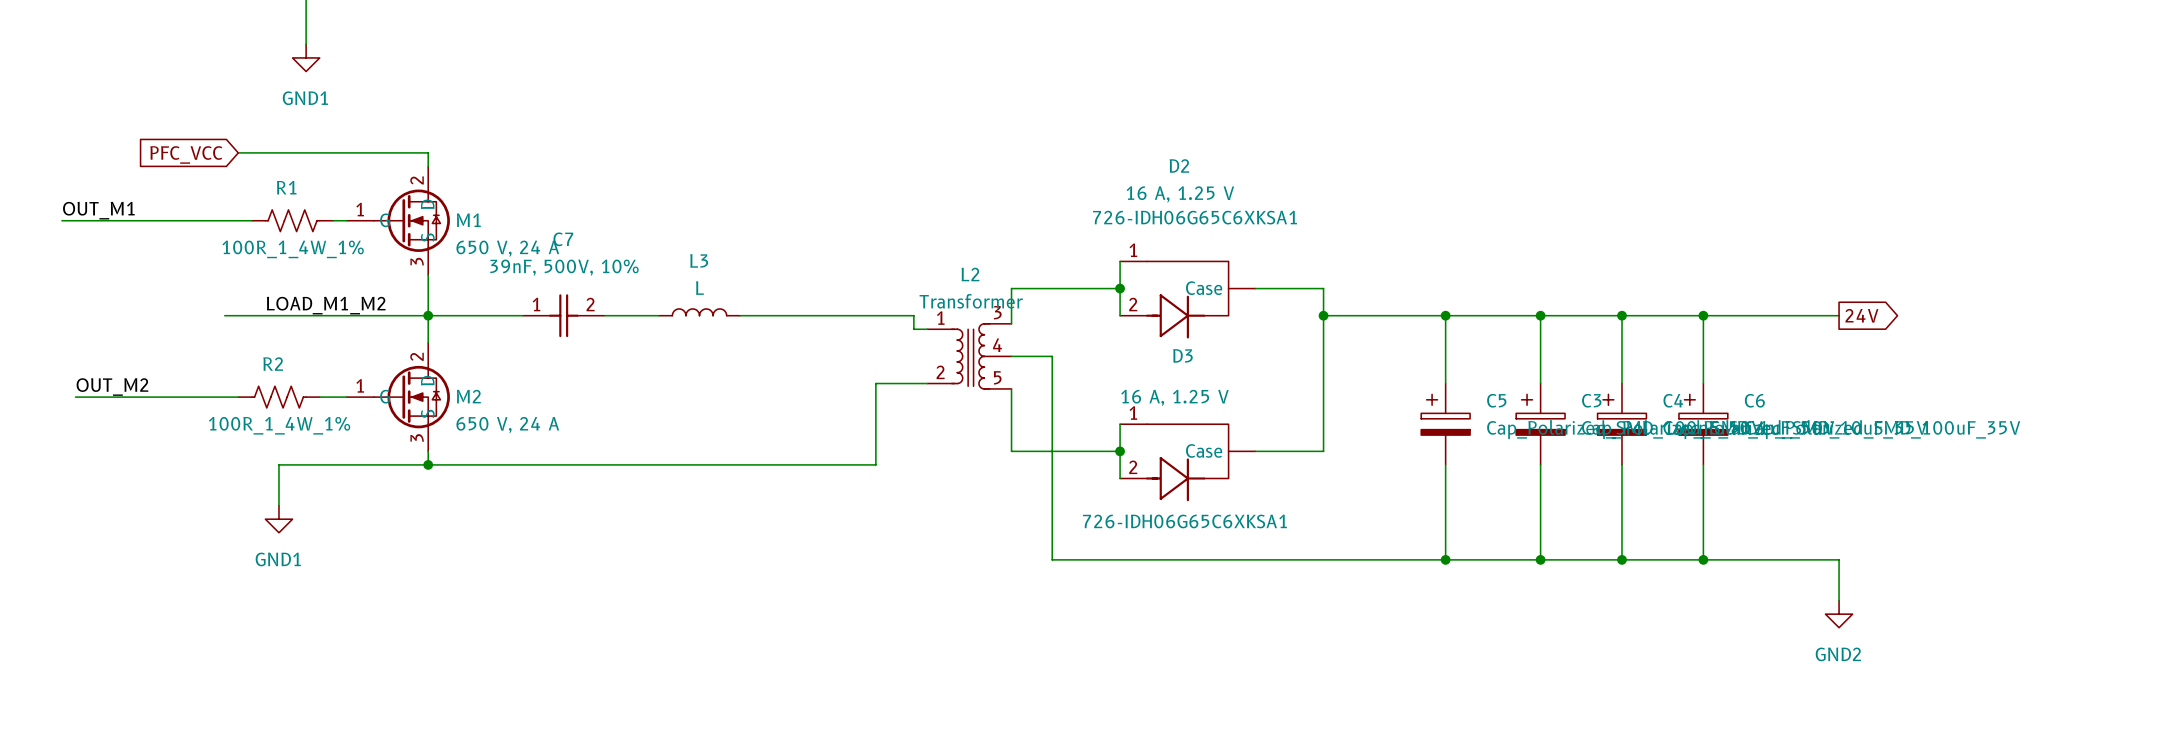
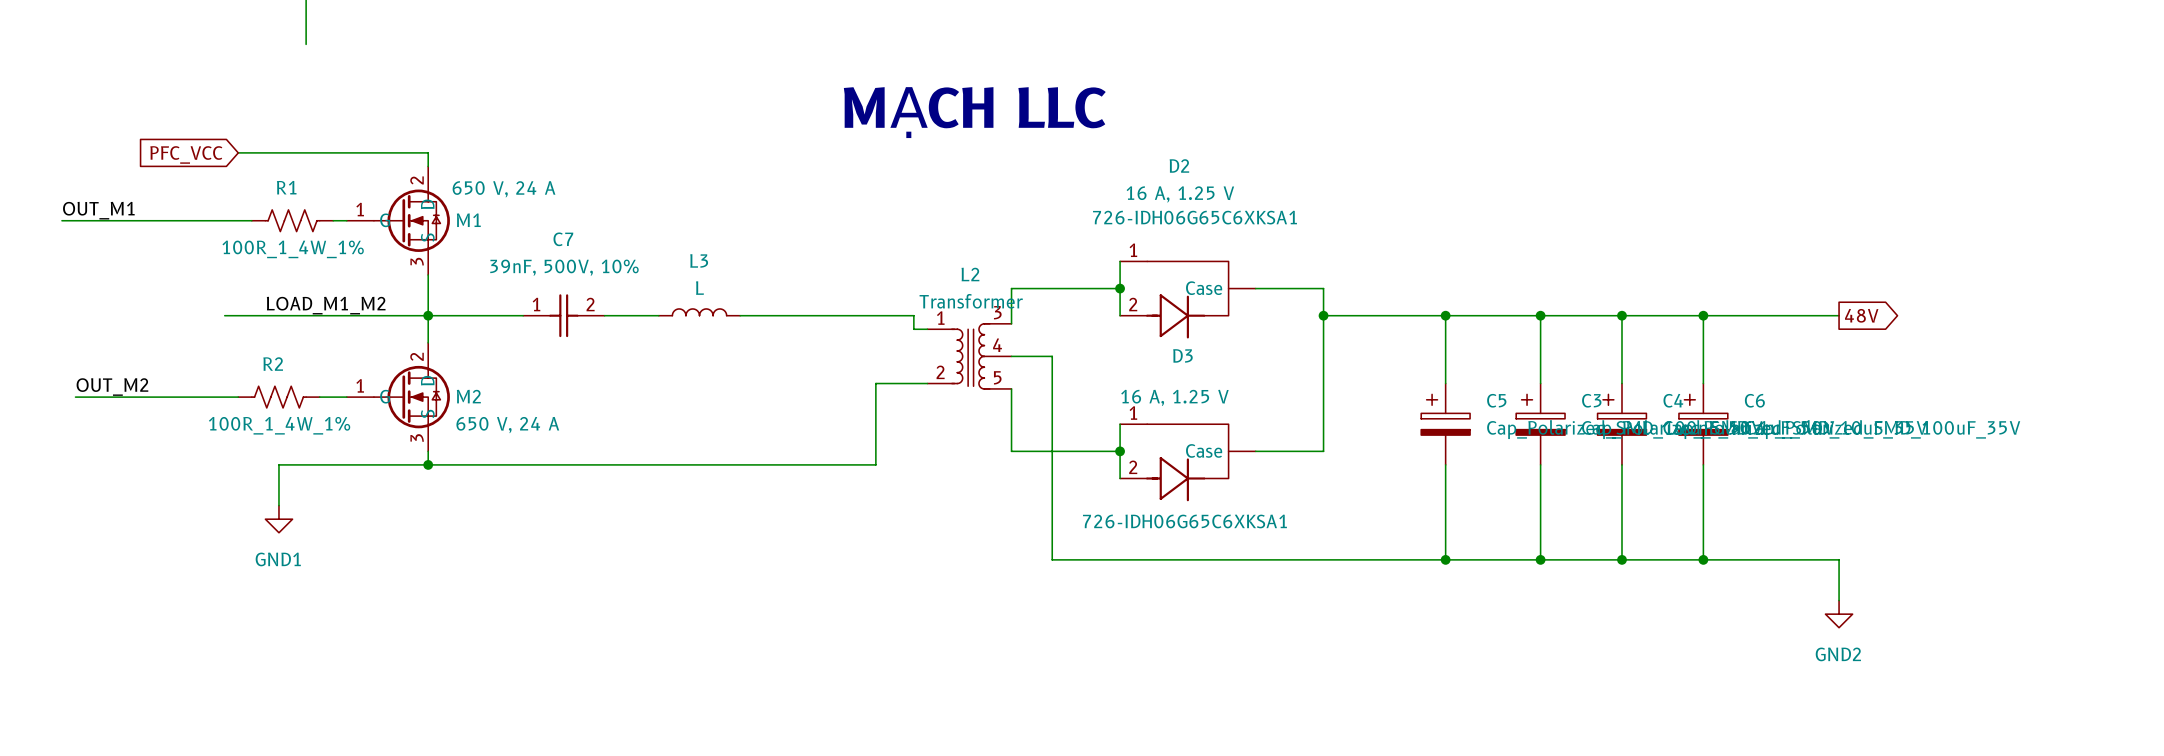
power symbol: GND1 (306, 57) -> none
text: none -> MẠCH LLC (974, 112)
M1 value position: 650 V, 24 A (507, 248) -> 650 V, 24 A (504, 189)
global label: 24V (1861, 315) -> 48V (1861, 315)

